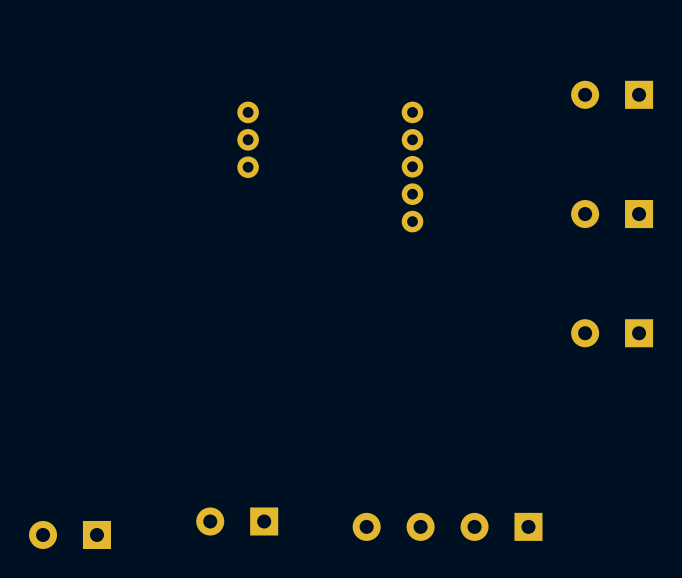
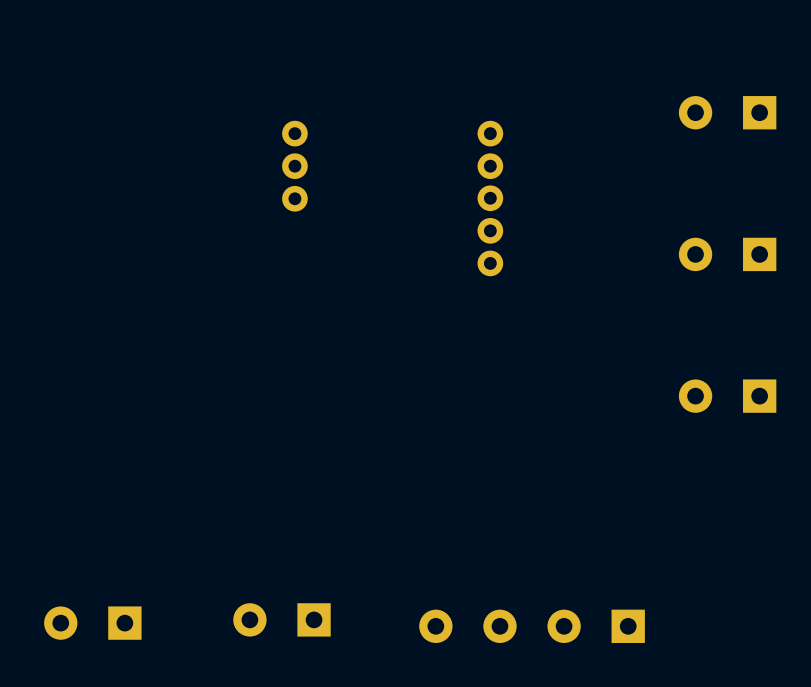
part position: (69, 534) -> (92, 623)

